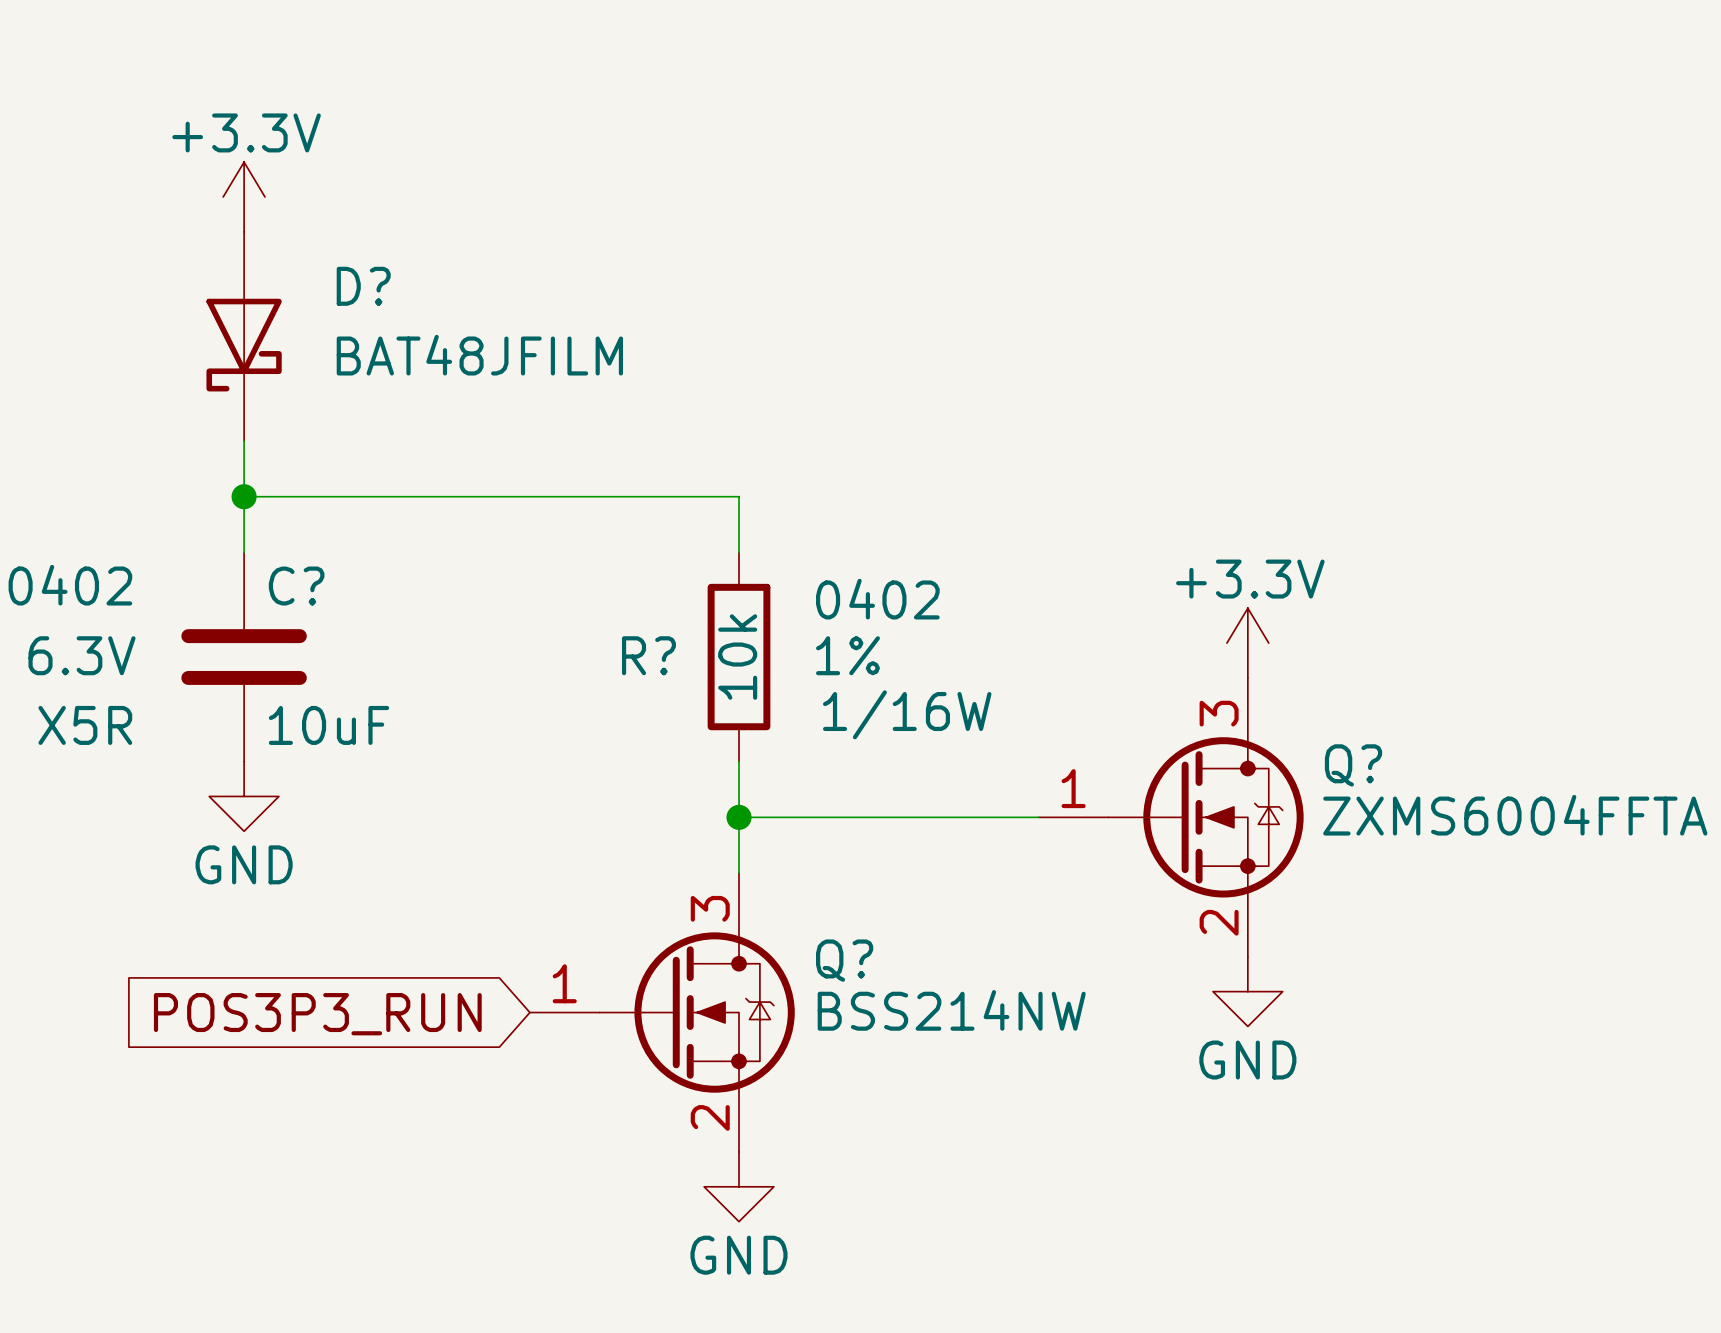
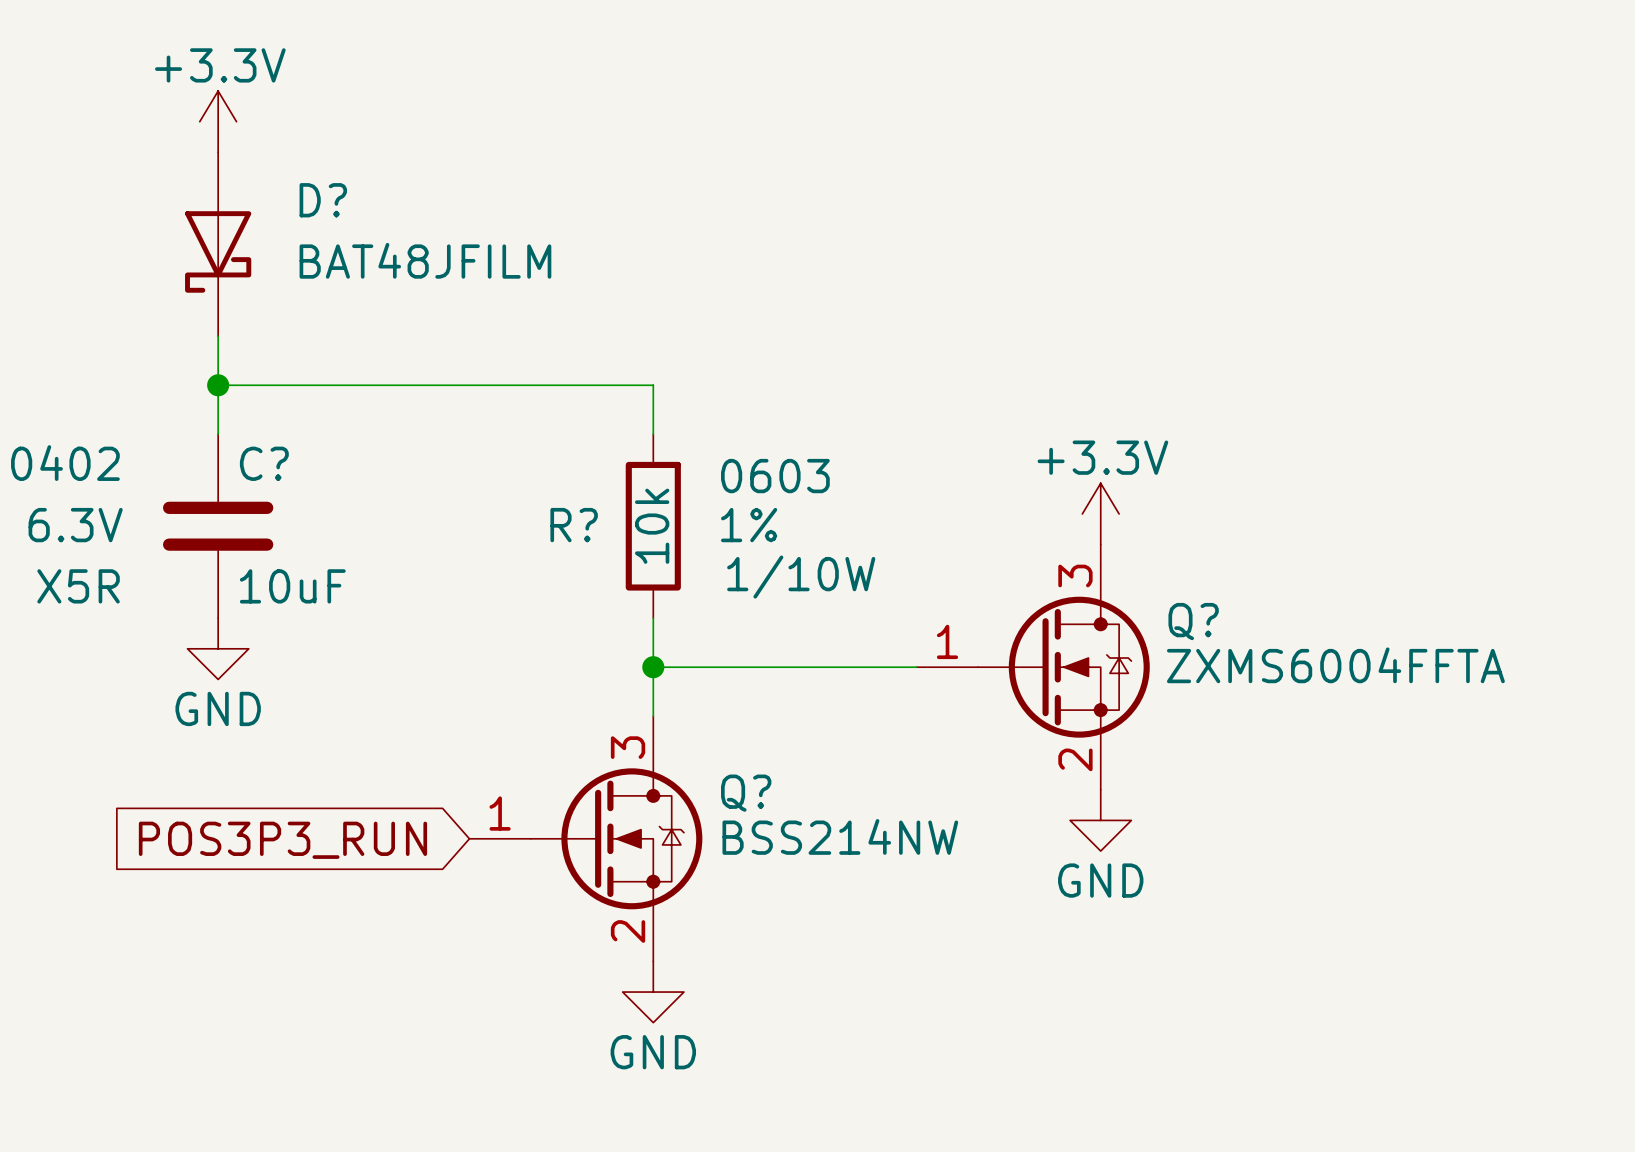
R? text: 0402 (877, 599) -> 0603 (775, 476)
R? text: 1/16W (907, 714) -> 1/10W (801, 577)

